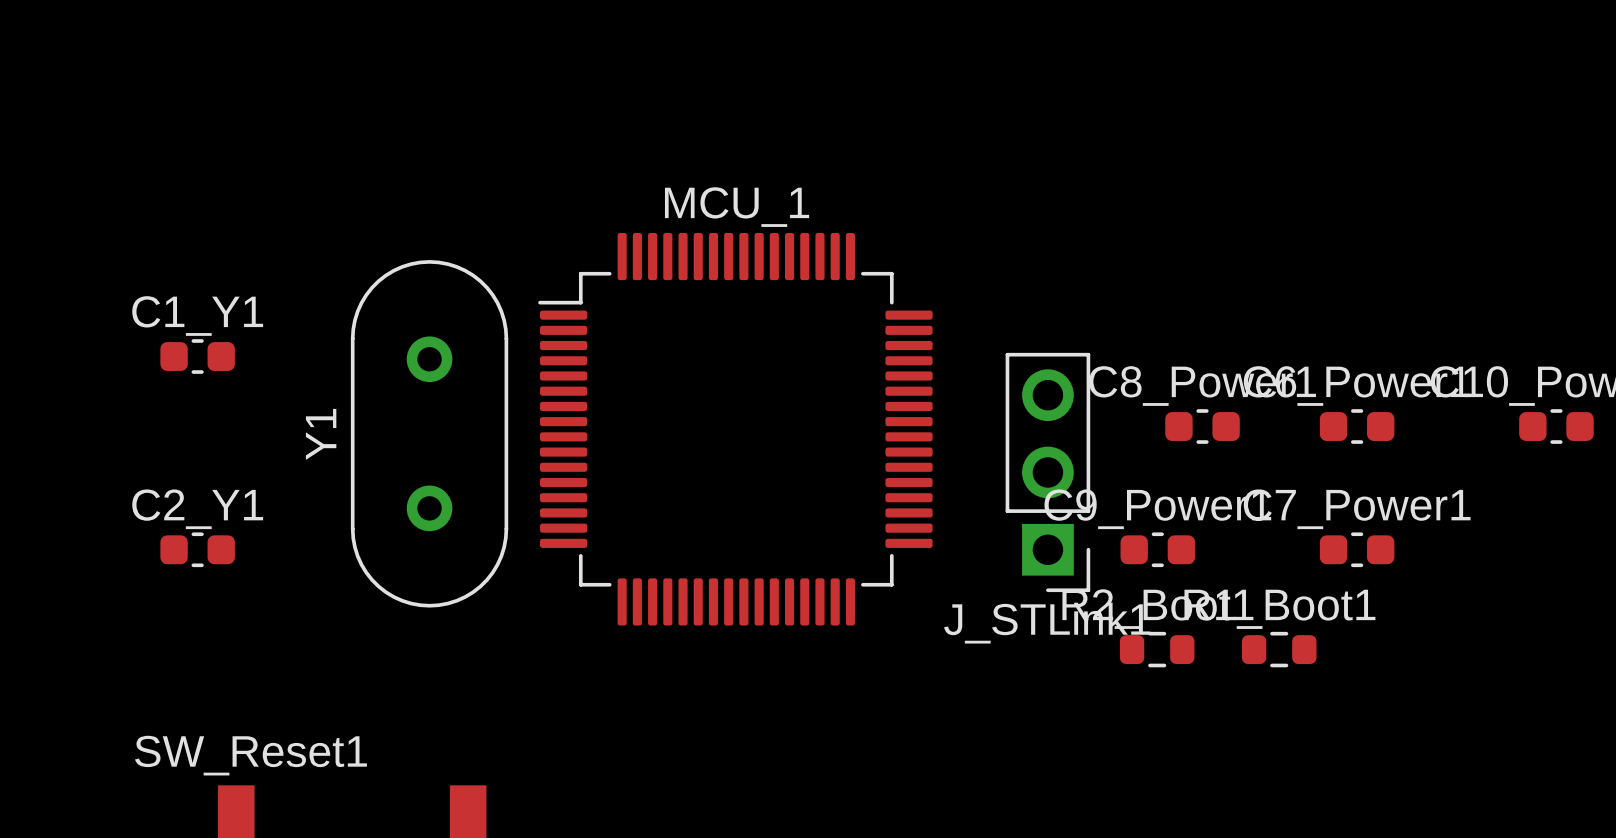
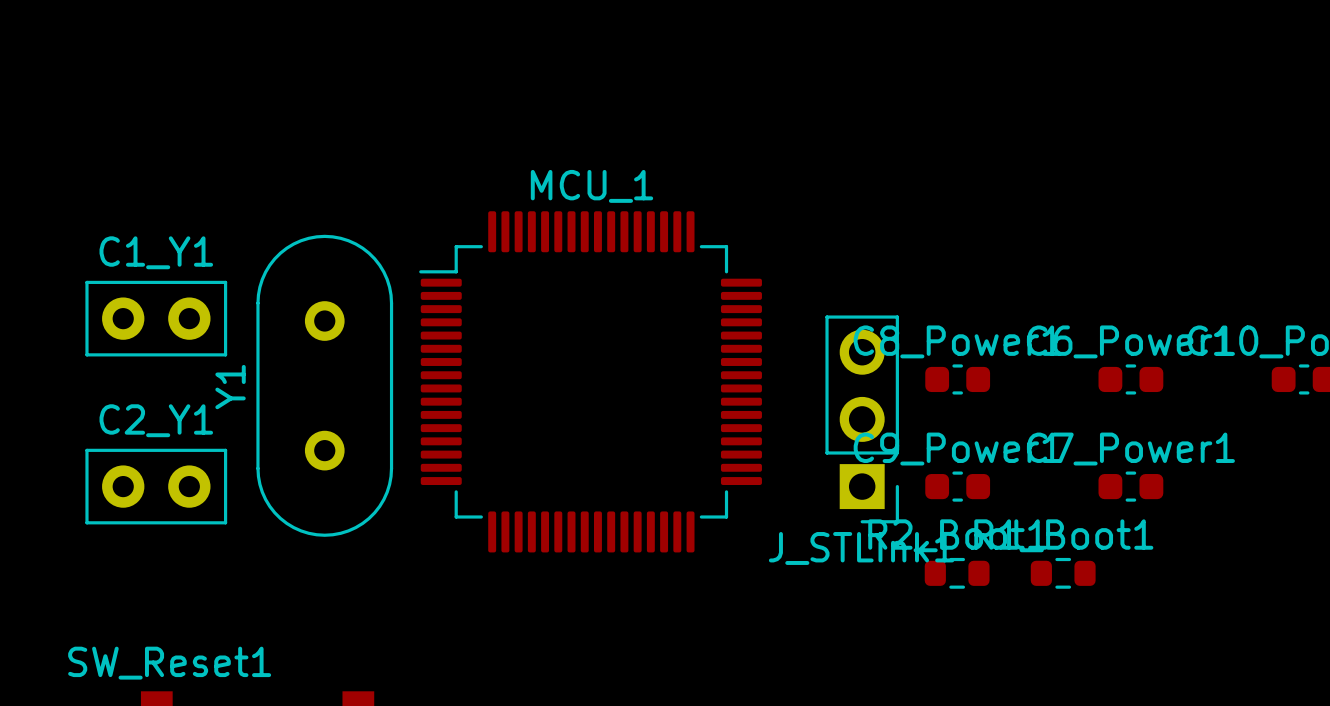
C1_Y1 footprint: [160, 339, 235, 374] -> [85, 280, 228, 357]
C8_Power1 position: (1202, 426) -> (957, 379)
C2_Y1 footprint: [160, 532, 235, 568] -> [85, 448, 228, 525]

